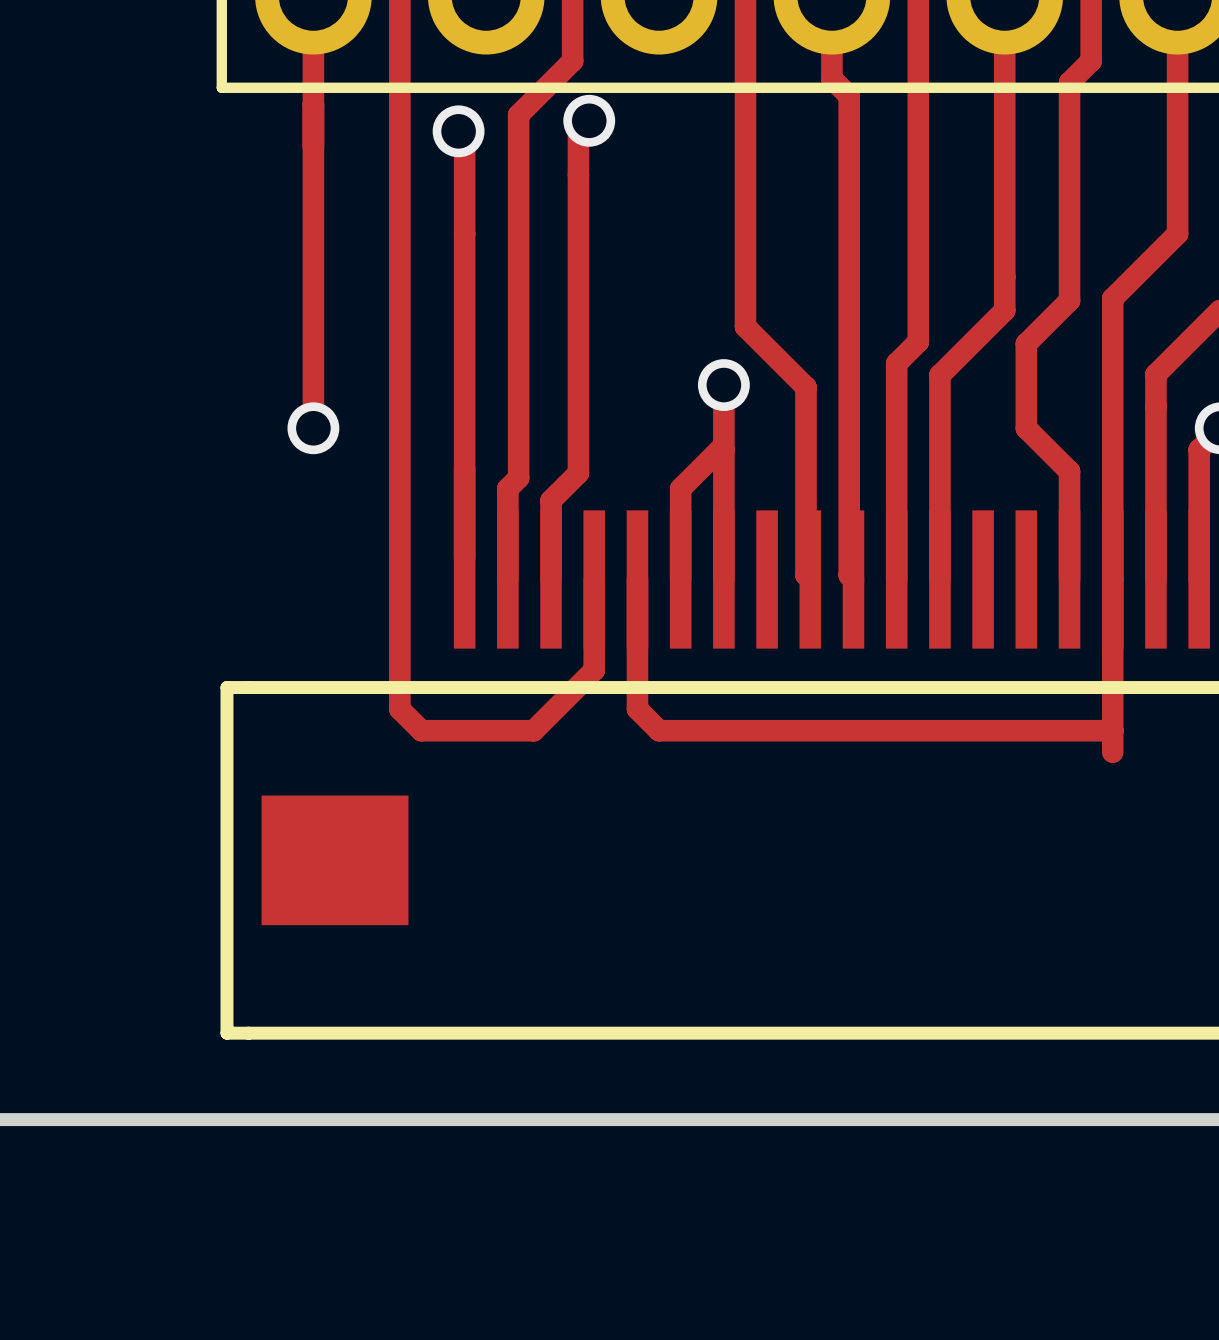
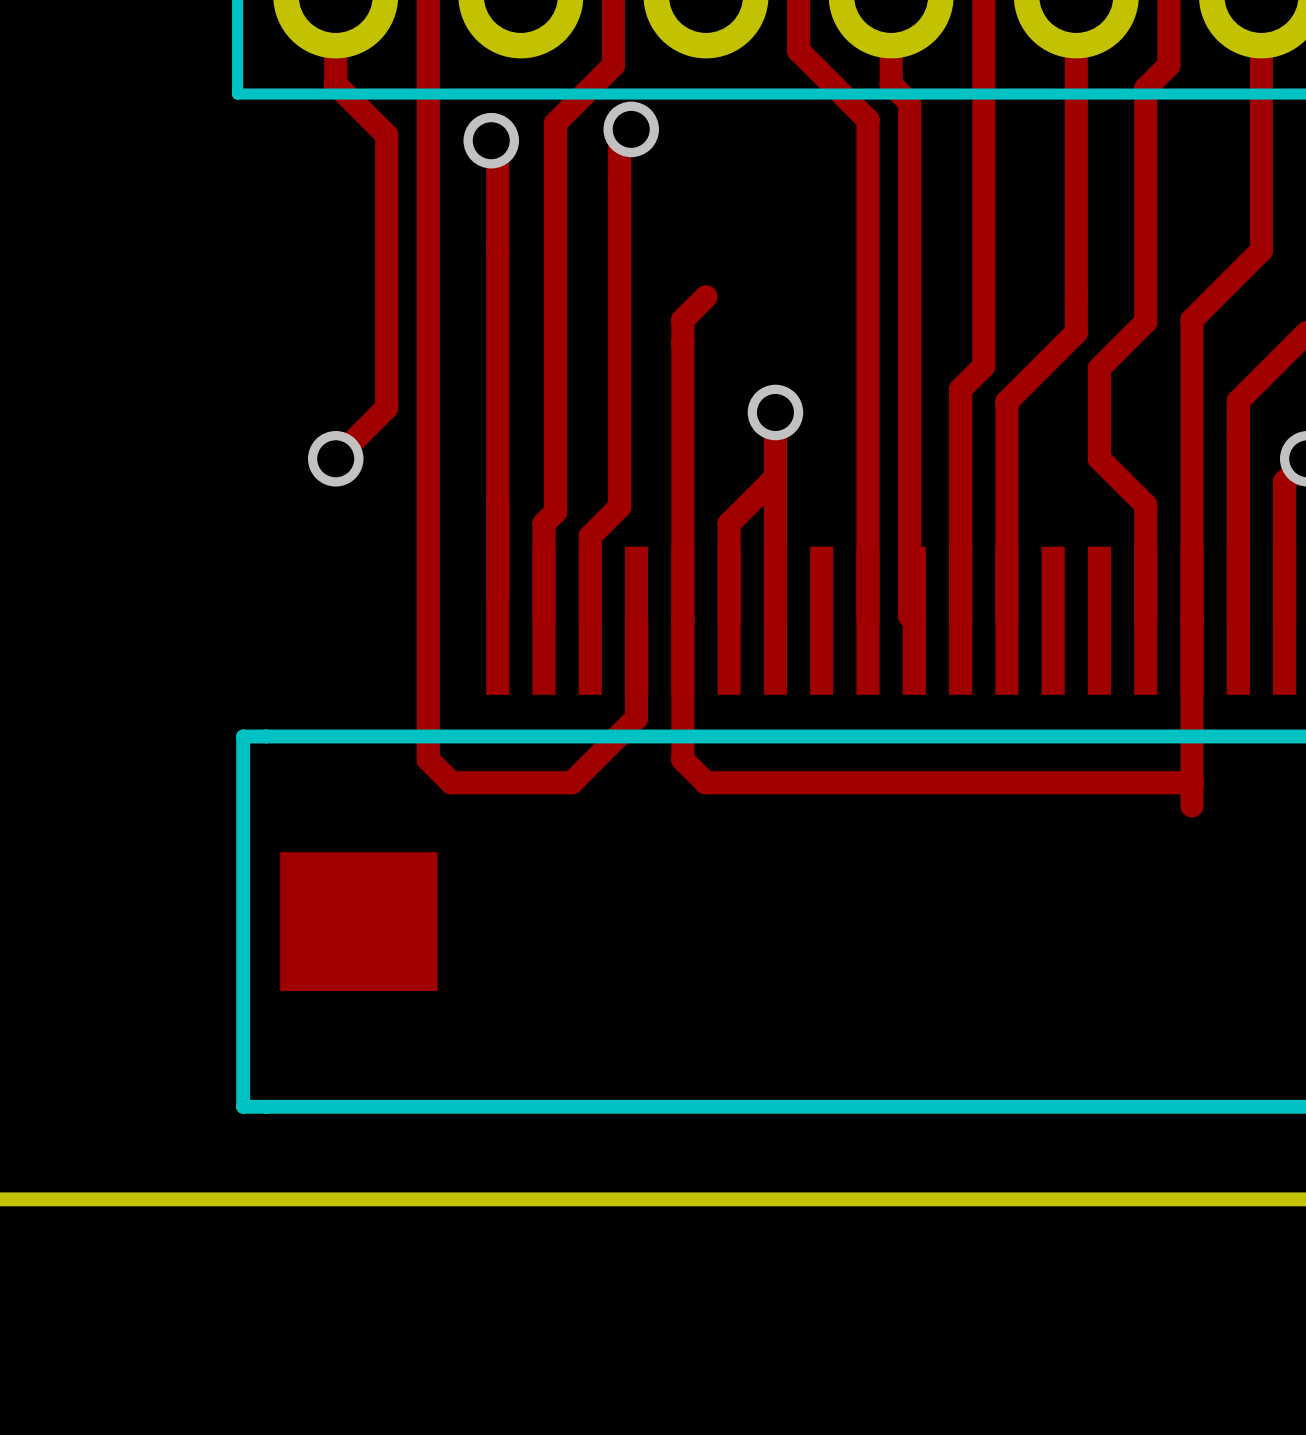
track: (745, 47) (745, 326) (805, 387) (805, 575) (810, 579) -> (798, 50) (868, 120) (868, 620)
track: (313, 78) (313, 428) -> (335, 84) (386, 135) (386, 407) (335, 458)
track: none -> (706, 296) (682, 319) (682, 620)

